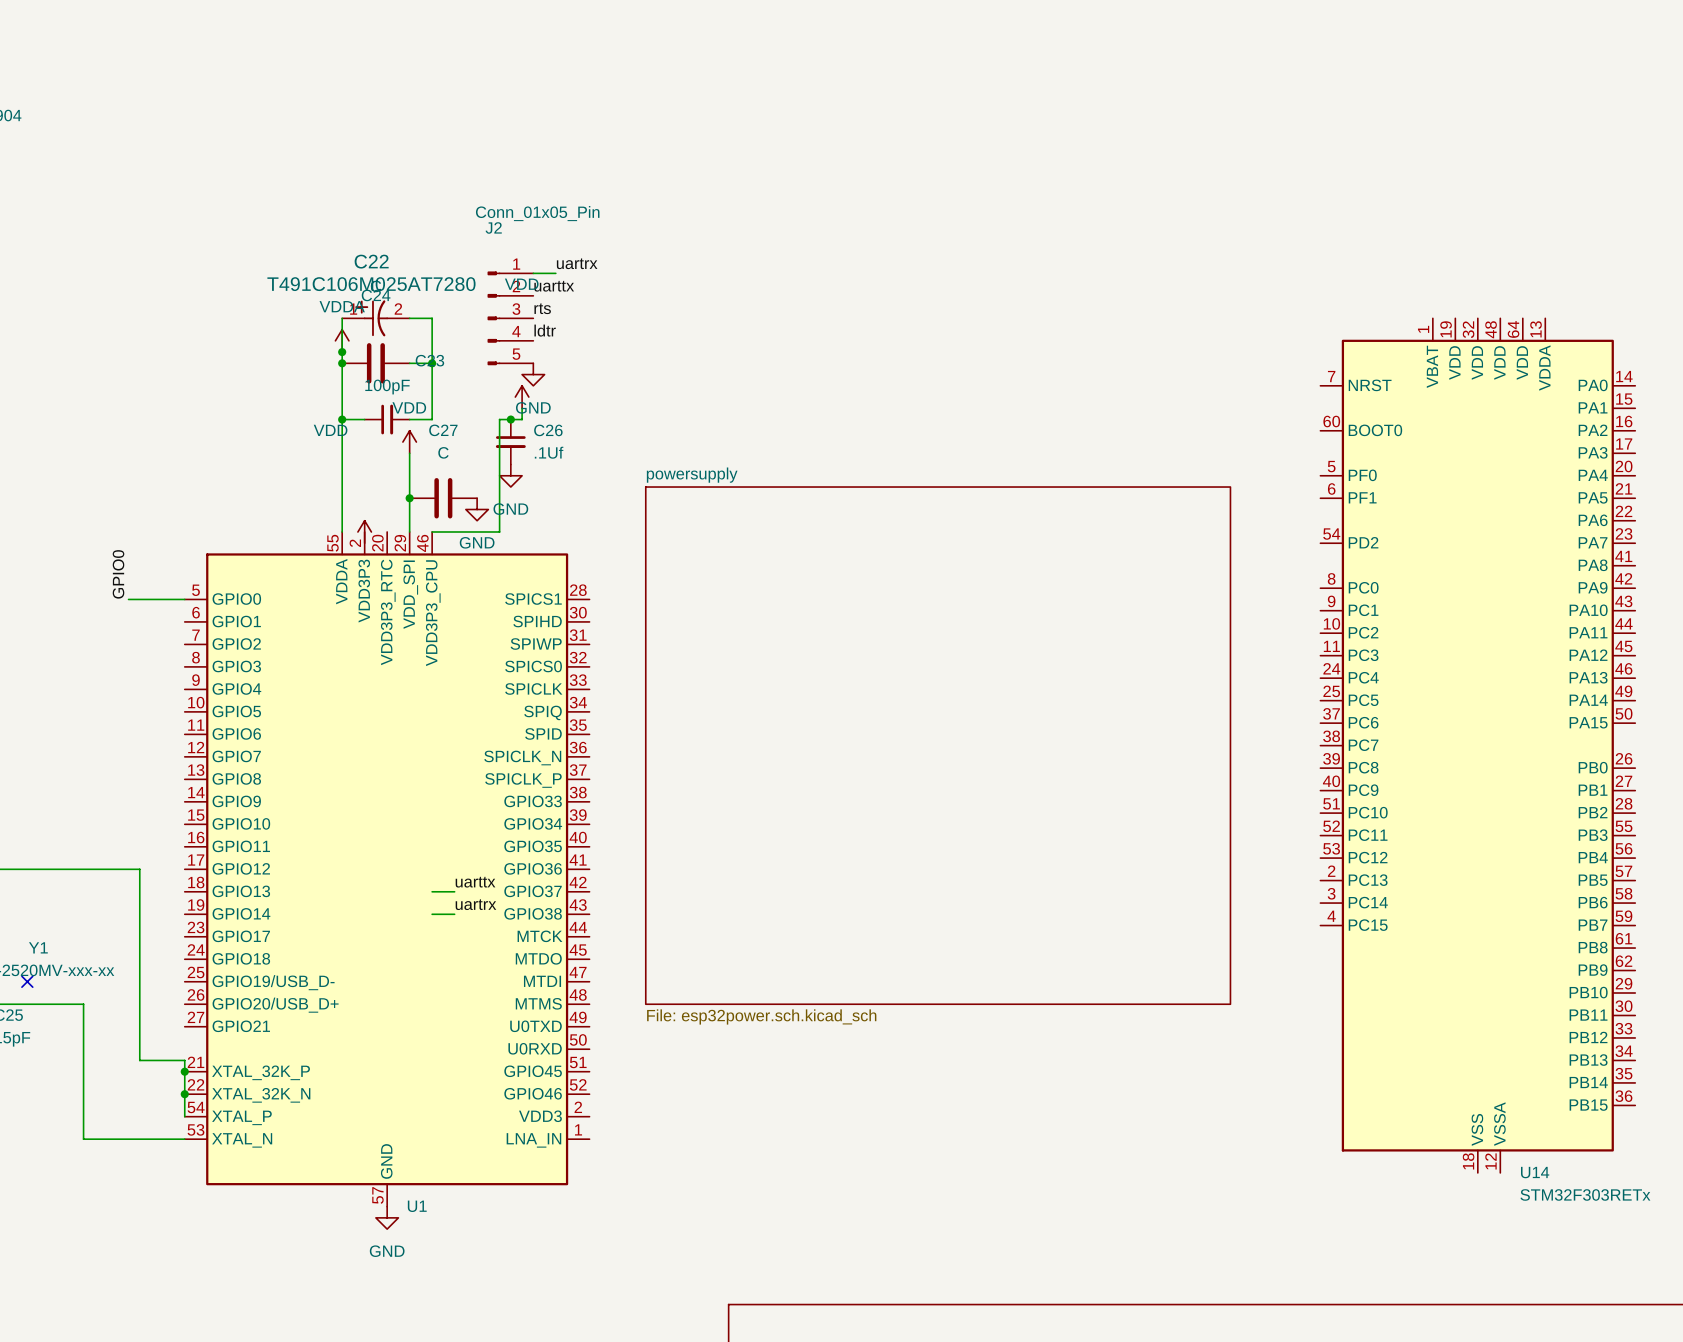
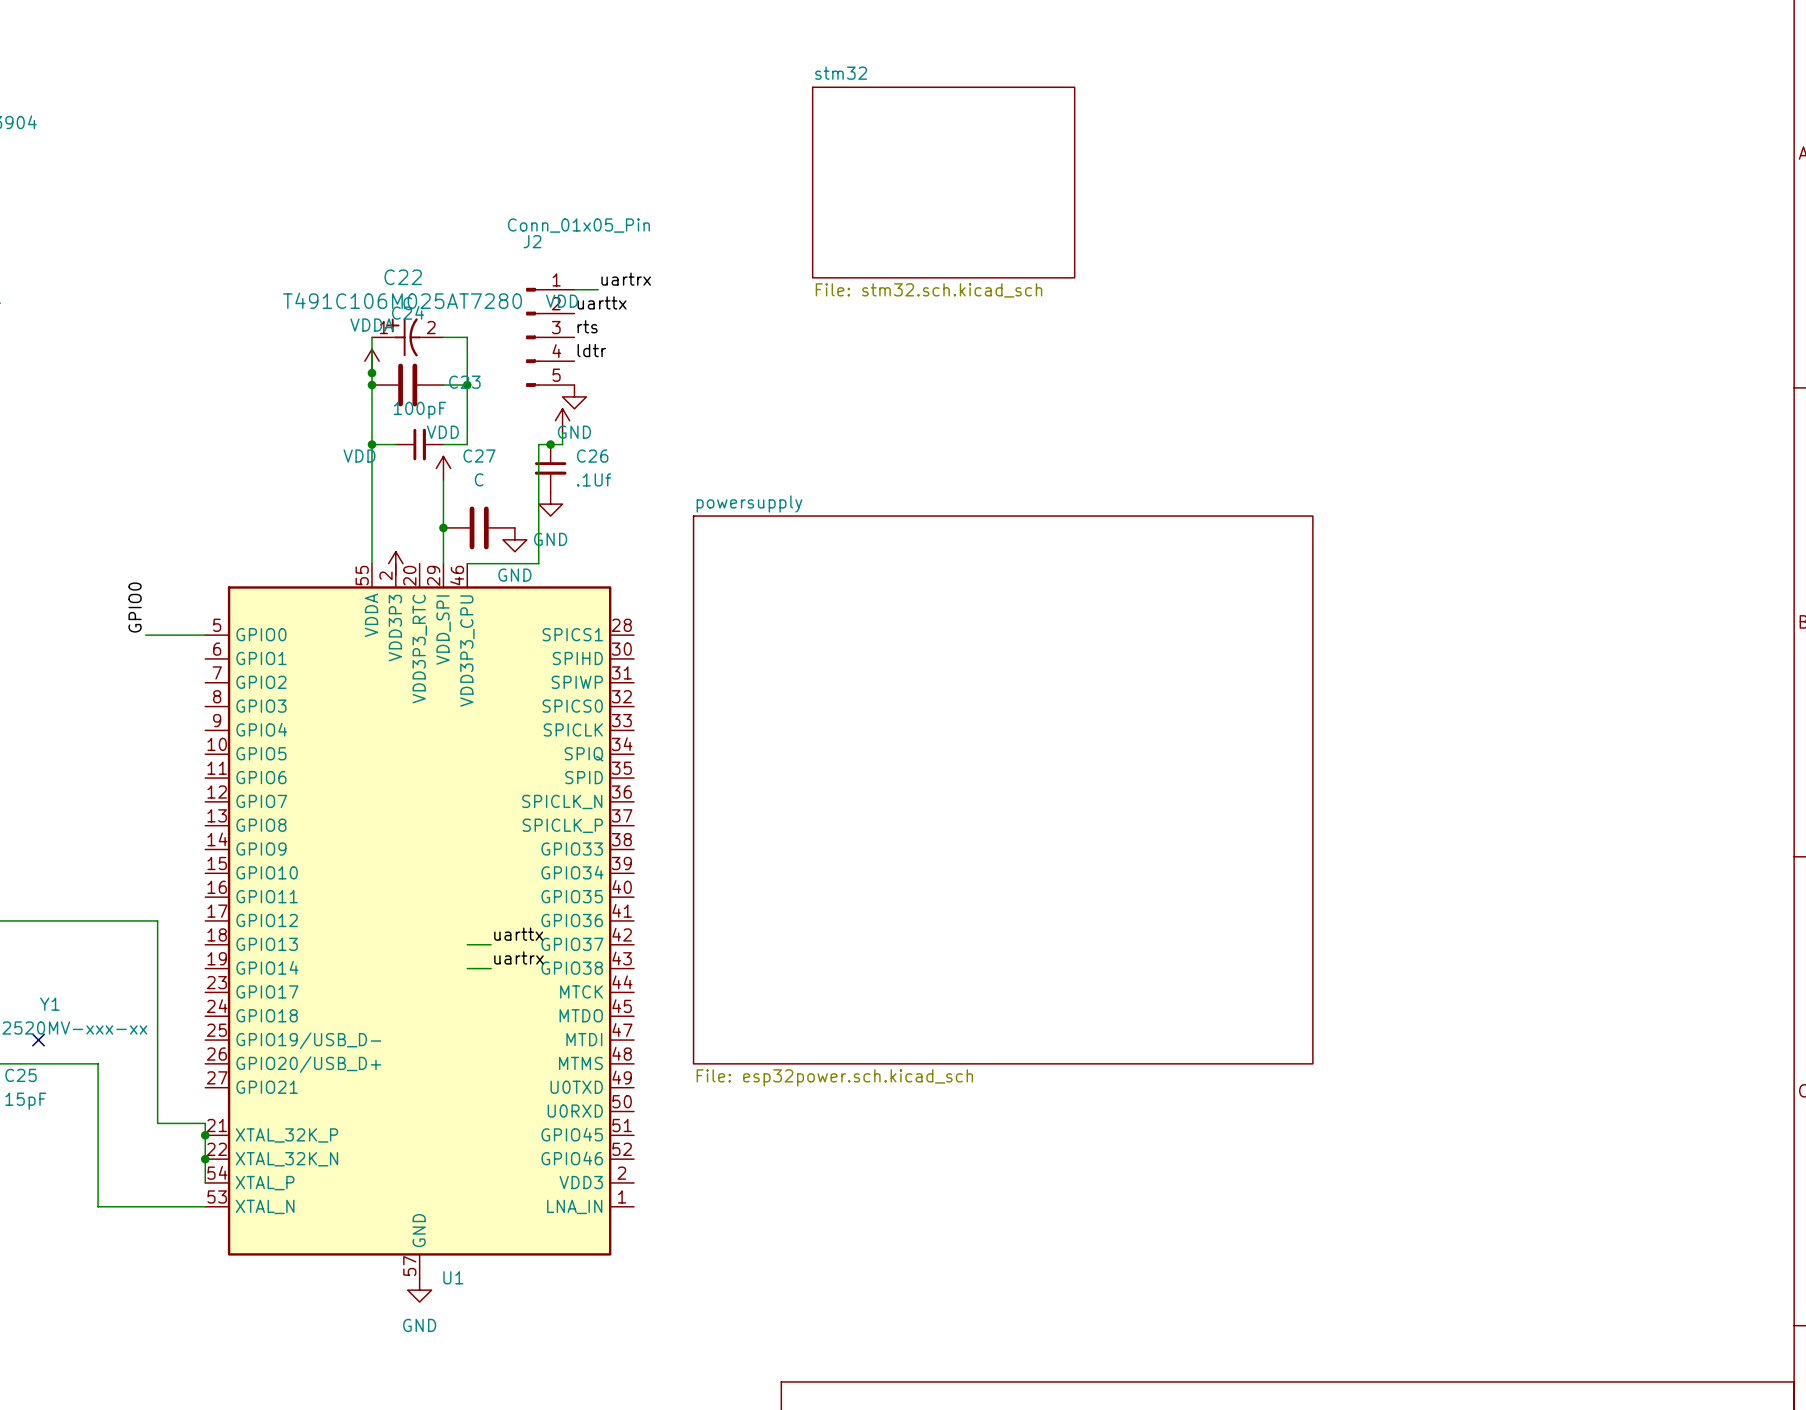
sheet stm32: none -> File: stm32.sch.kicad_sch (943, 182)
U14: STM32F303RETx (1477, 745) -> none

